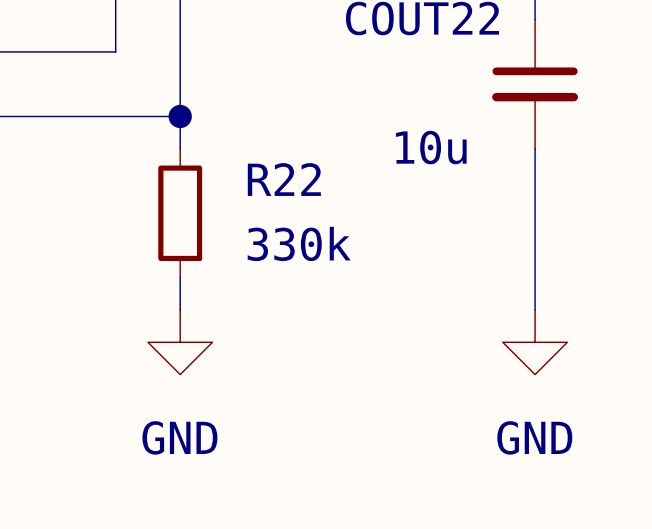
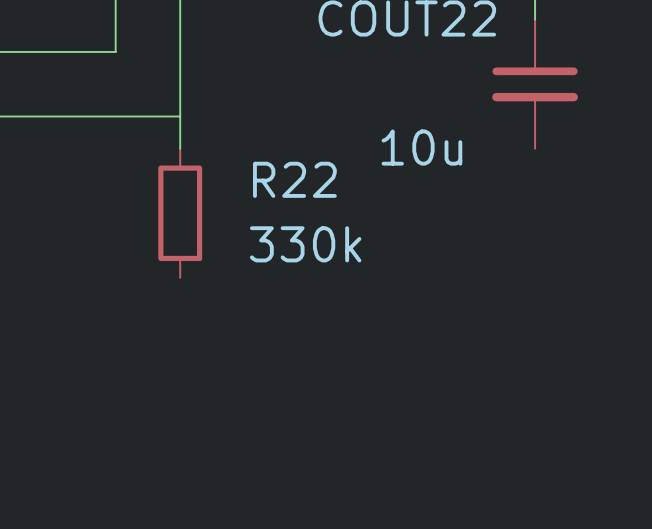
junction: (180, 116) -> none
wire: (535, 148) (535, 310) -> none
wire: (180, 277) (180, 310) -> none
power symbol: GND (180, 342) -> none
power symbol: GND (535, 342) -> none

